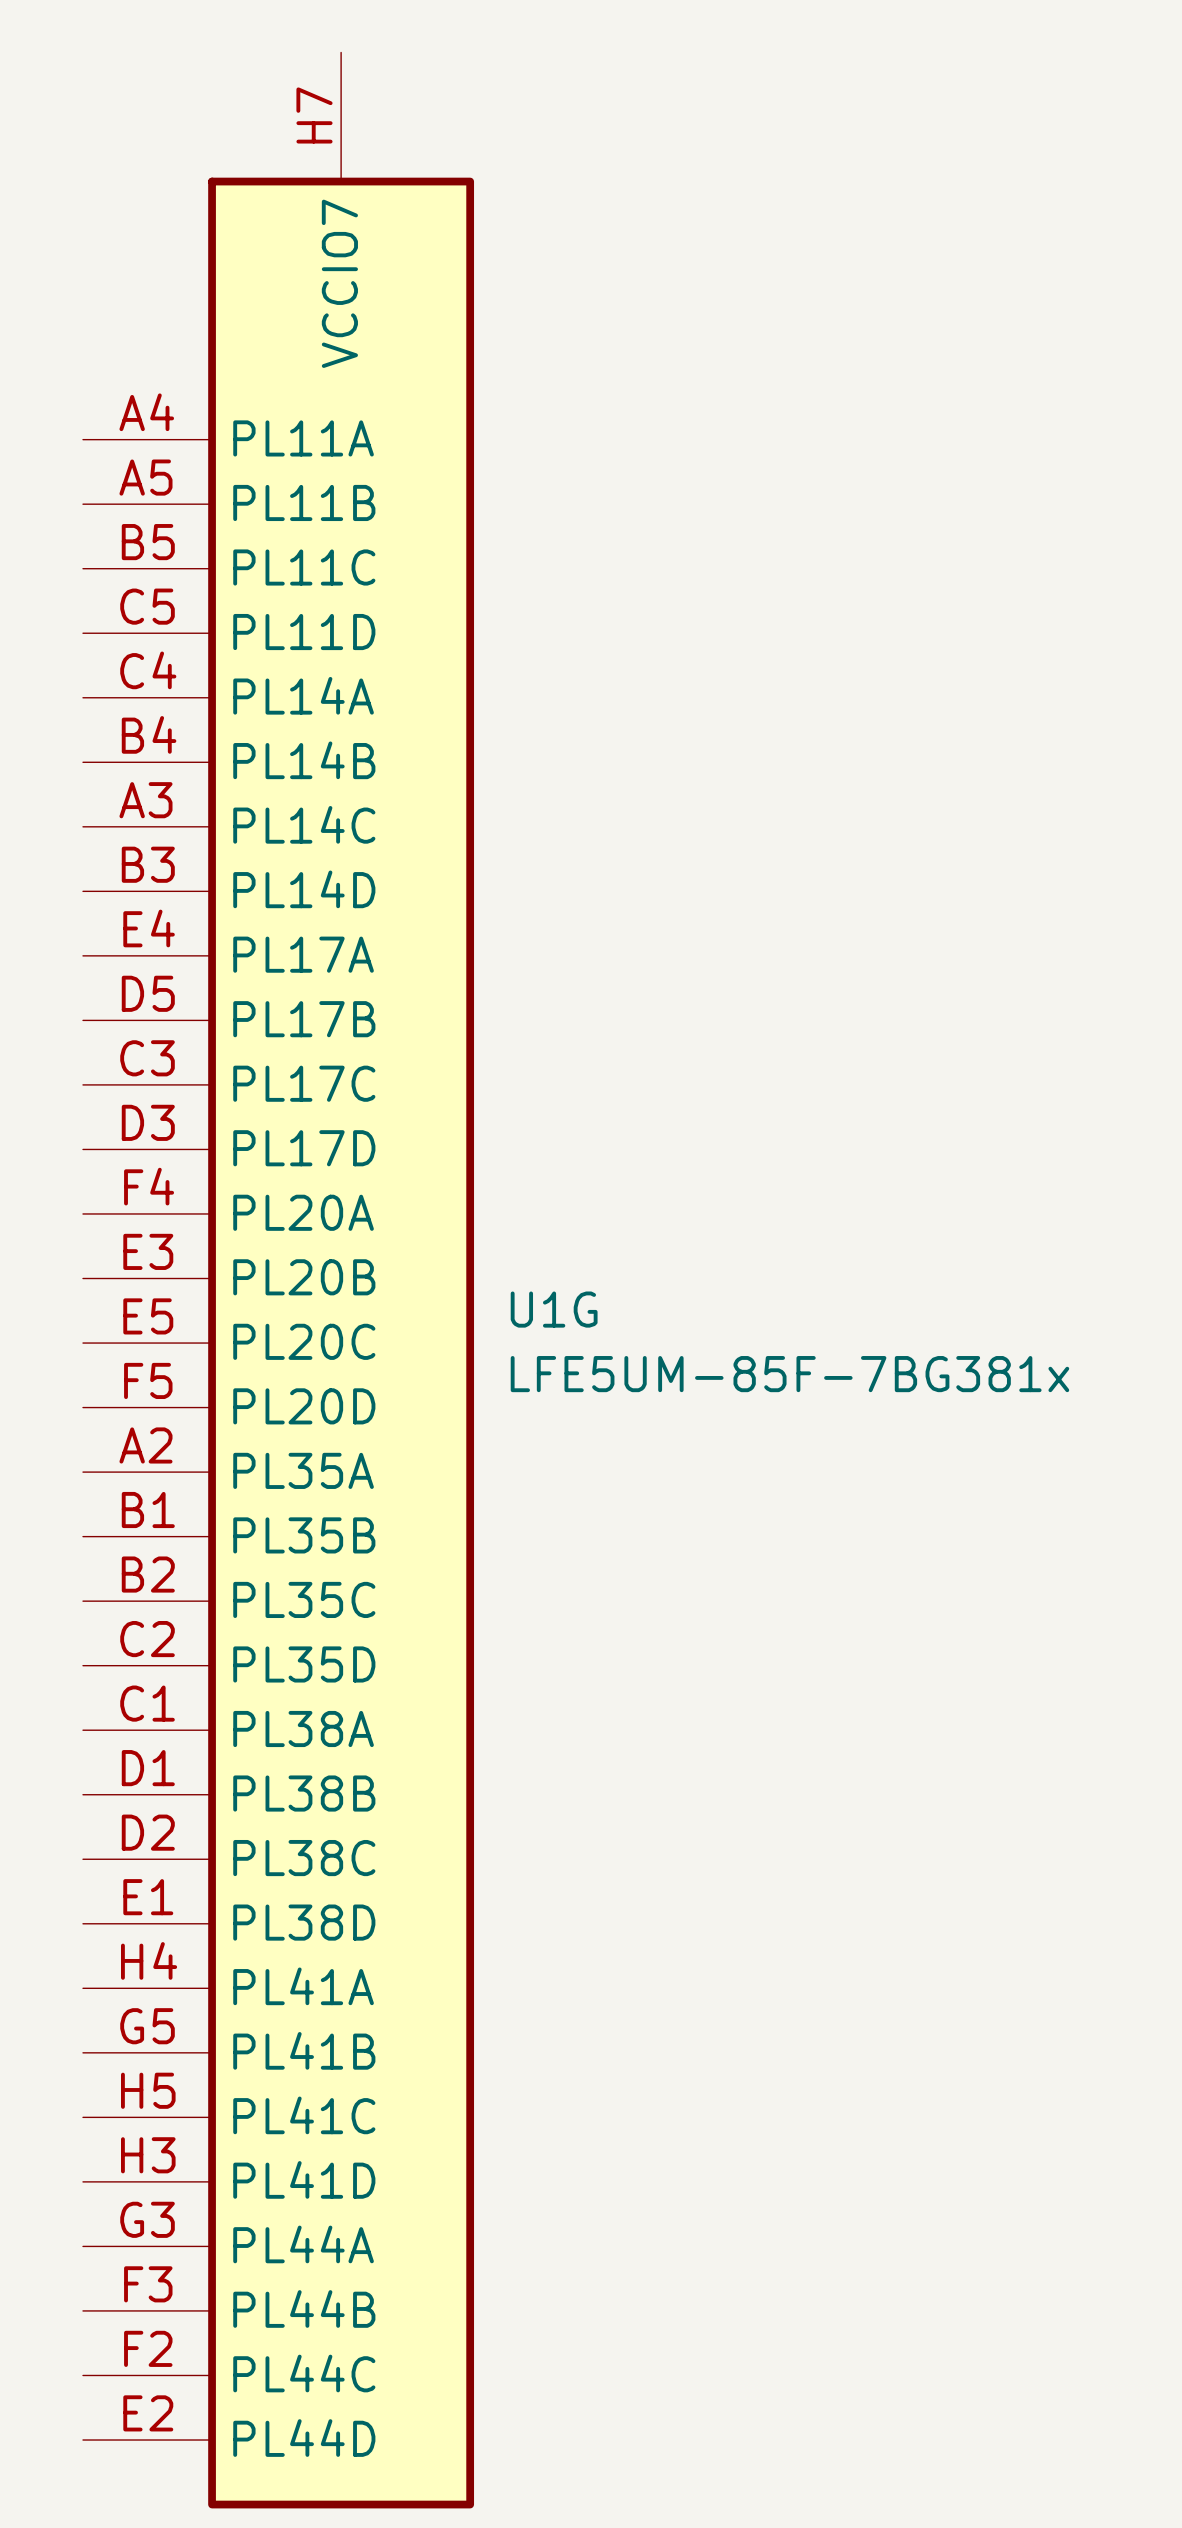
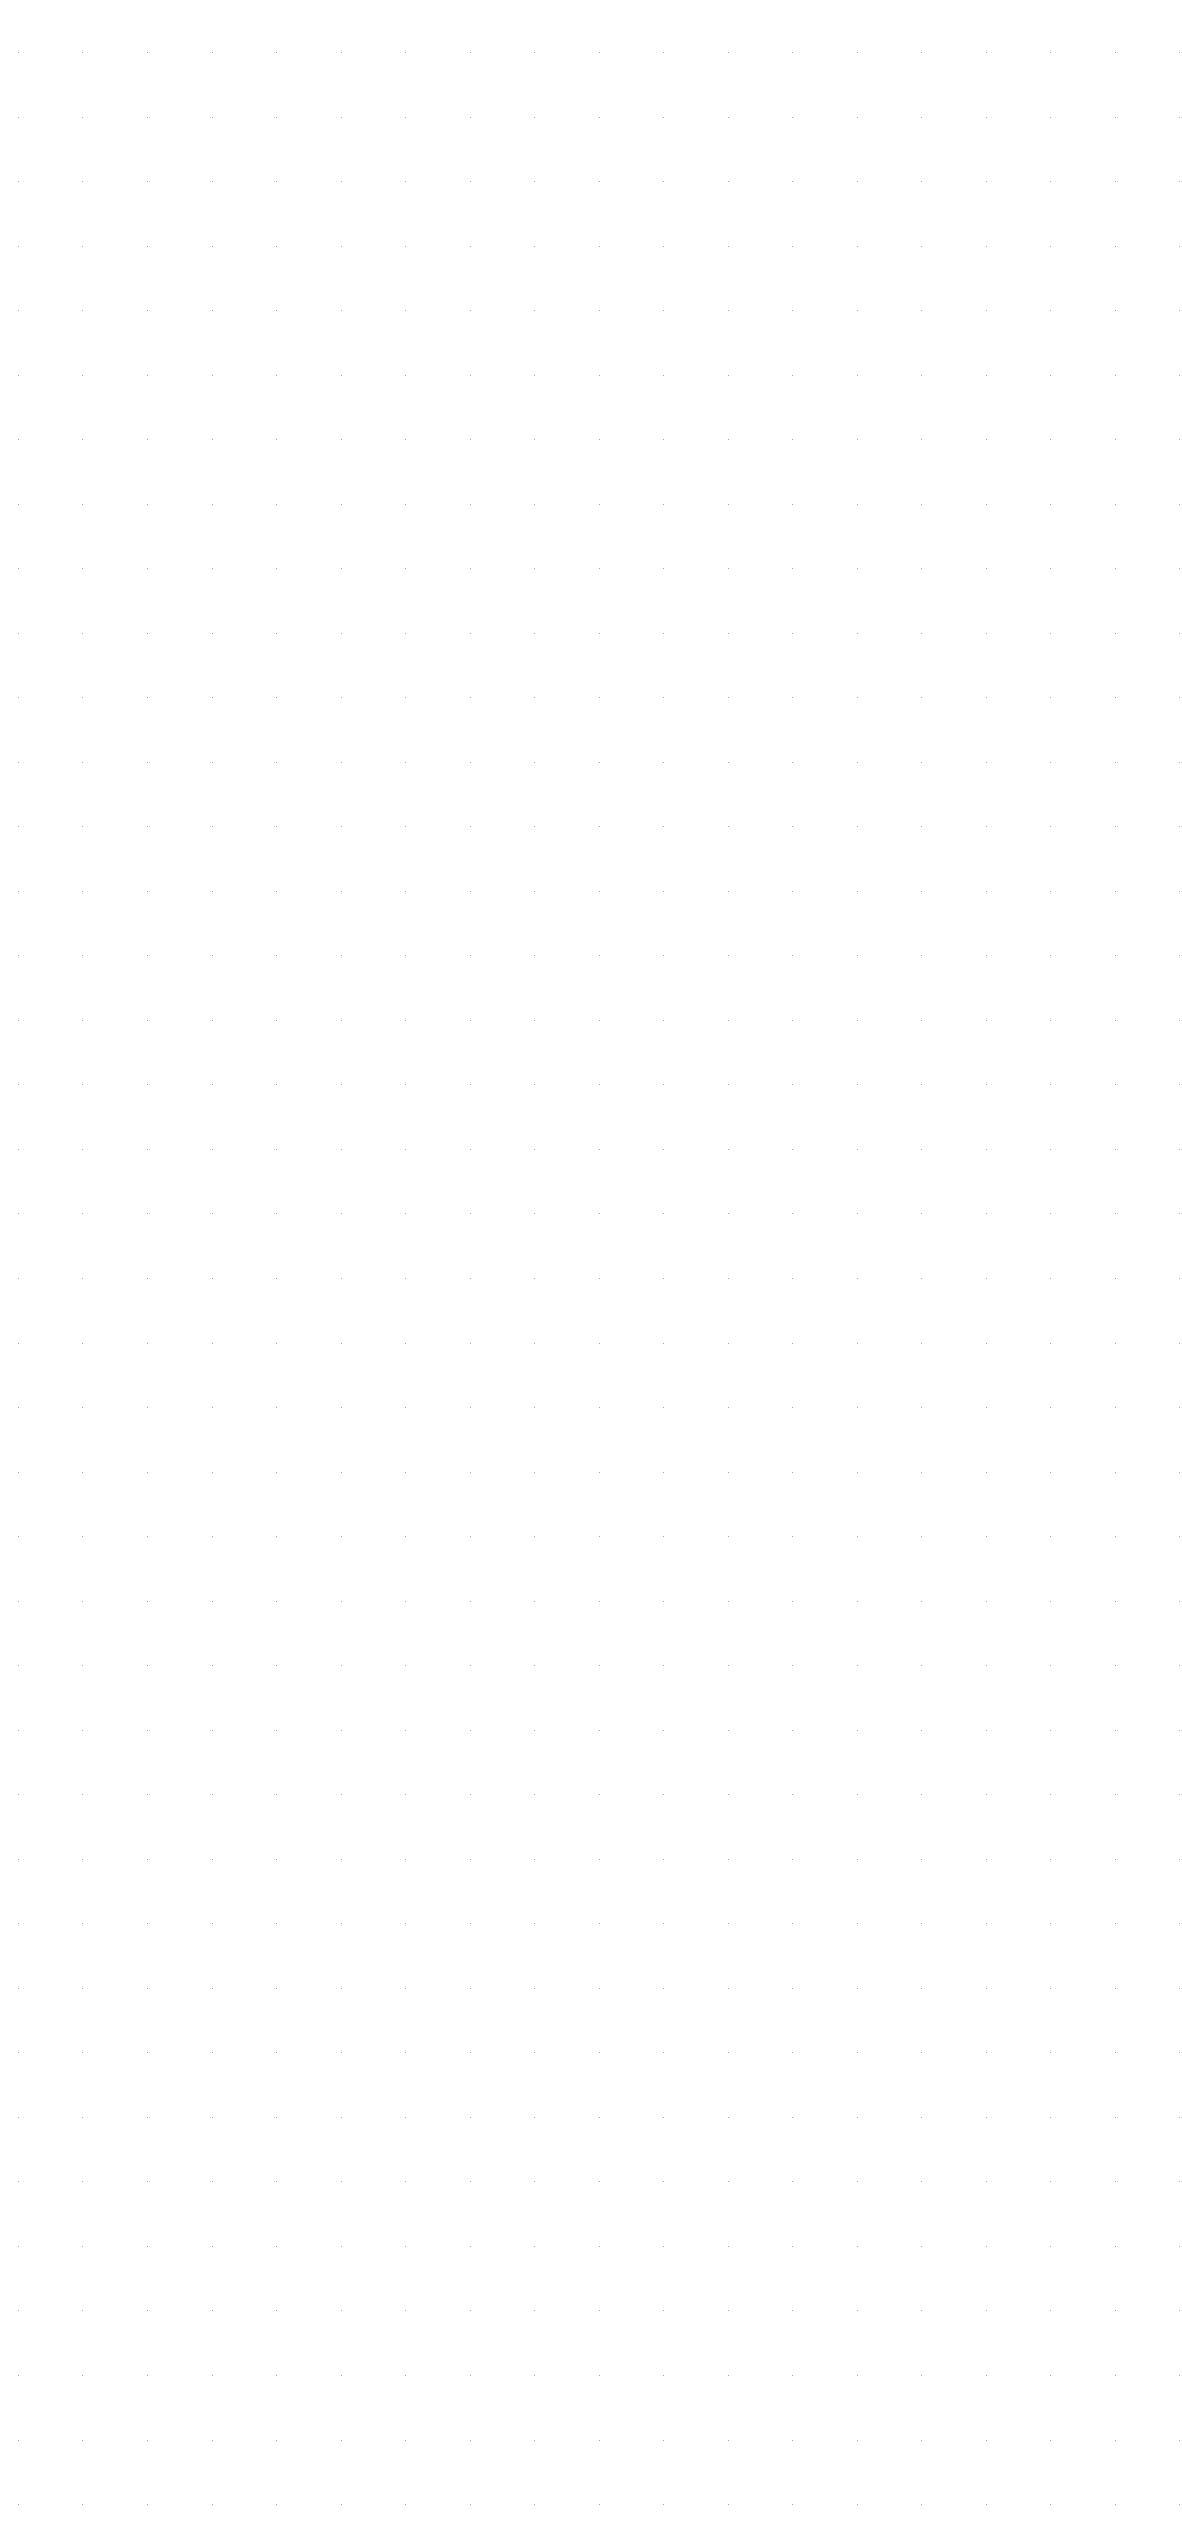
U1G: LFE5UM-85F-7BG381x (278, 1280) -> none

